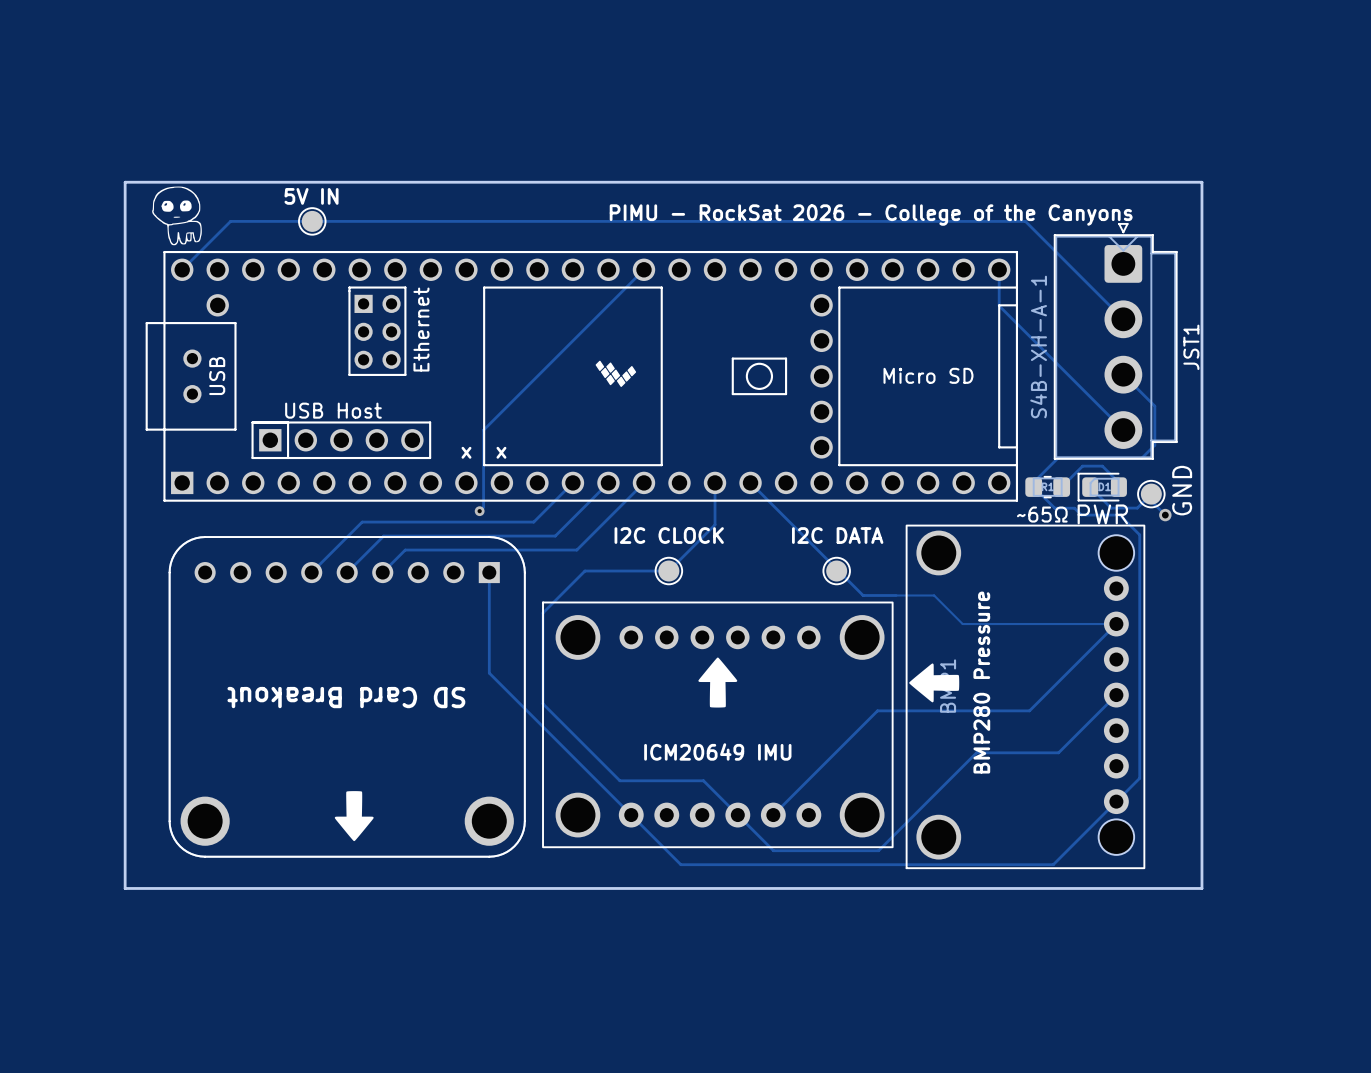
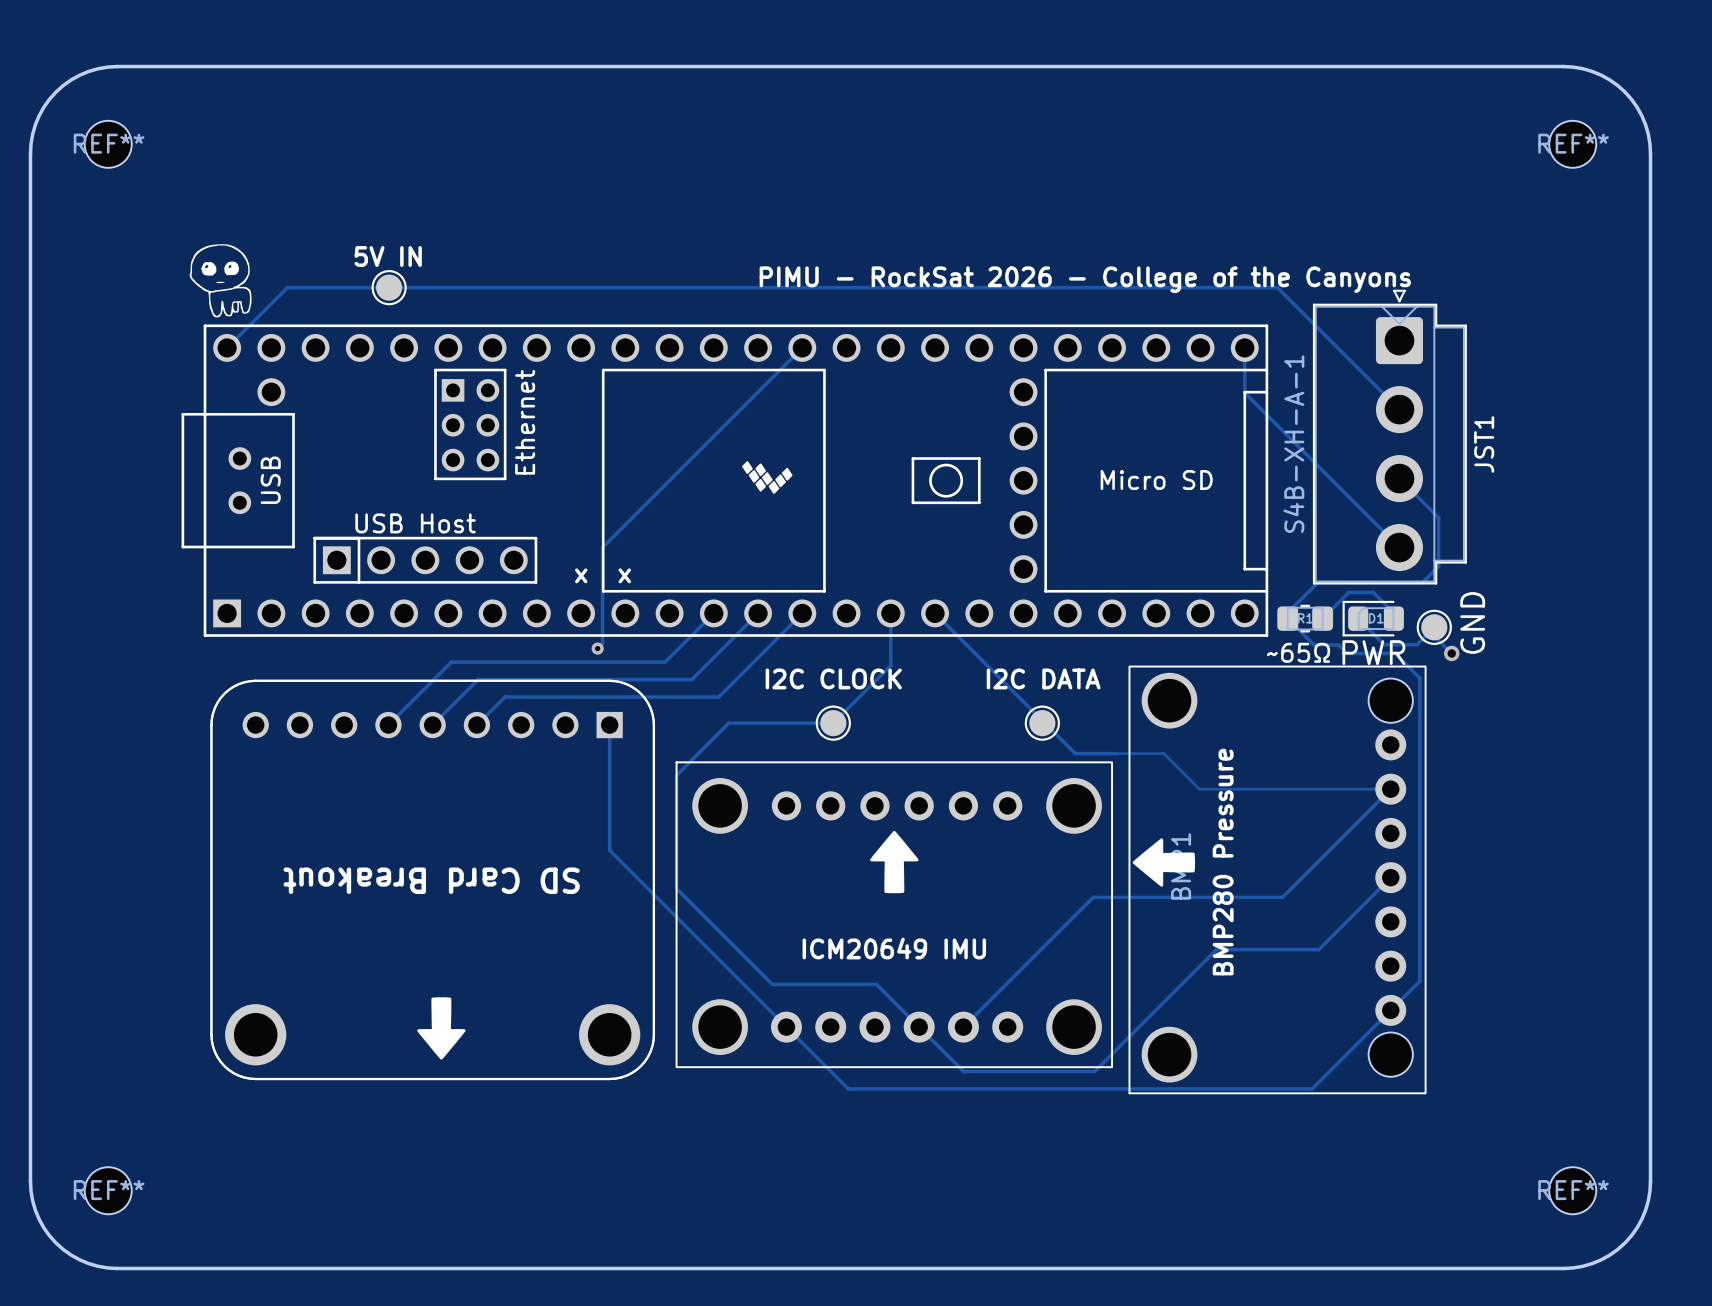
REF**: none -> (108, 144)
REF**: none -> (1572, 144)
board edge: (125, 182) (1201, 182) (1201, 888) (125, 888) (125, 182) -> (117, 66) (88, 71) (71, 79) (55, 92) (43, 107) (35, 124) (30, 153) (30, 1181) (32, 1200) (39, 1219) (49, 1235) (63, 1249) (88, 1263) (117, 1268) (1563, 1268) (1582, 1266) (1601, 1259) (1617, 1249) (1631, 1235) (1645, 1210) (1650, 1181) (1650, 153) (1648, 134) (1641, 115) (1631, 99) (1617, 85) (1592, 71) (1563, 66) (117, 66)
REF**: none -> (108, 1190)
REF**: none -> (1572, 1190)

